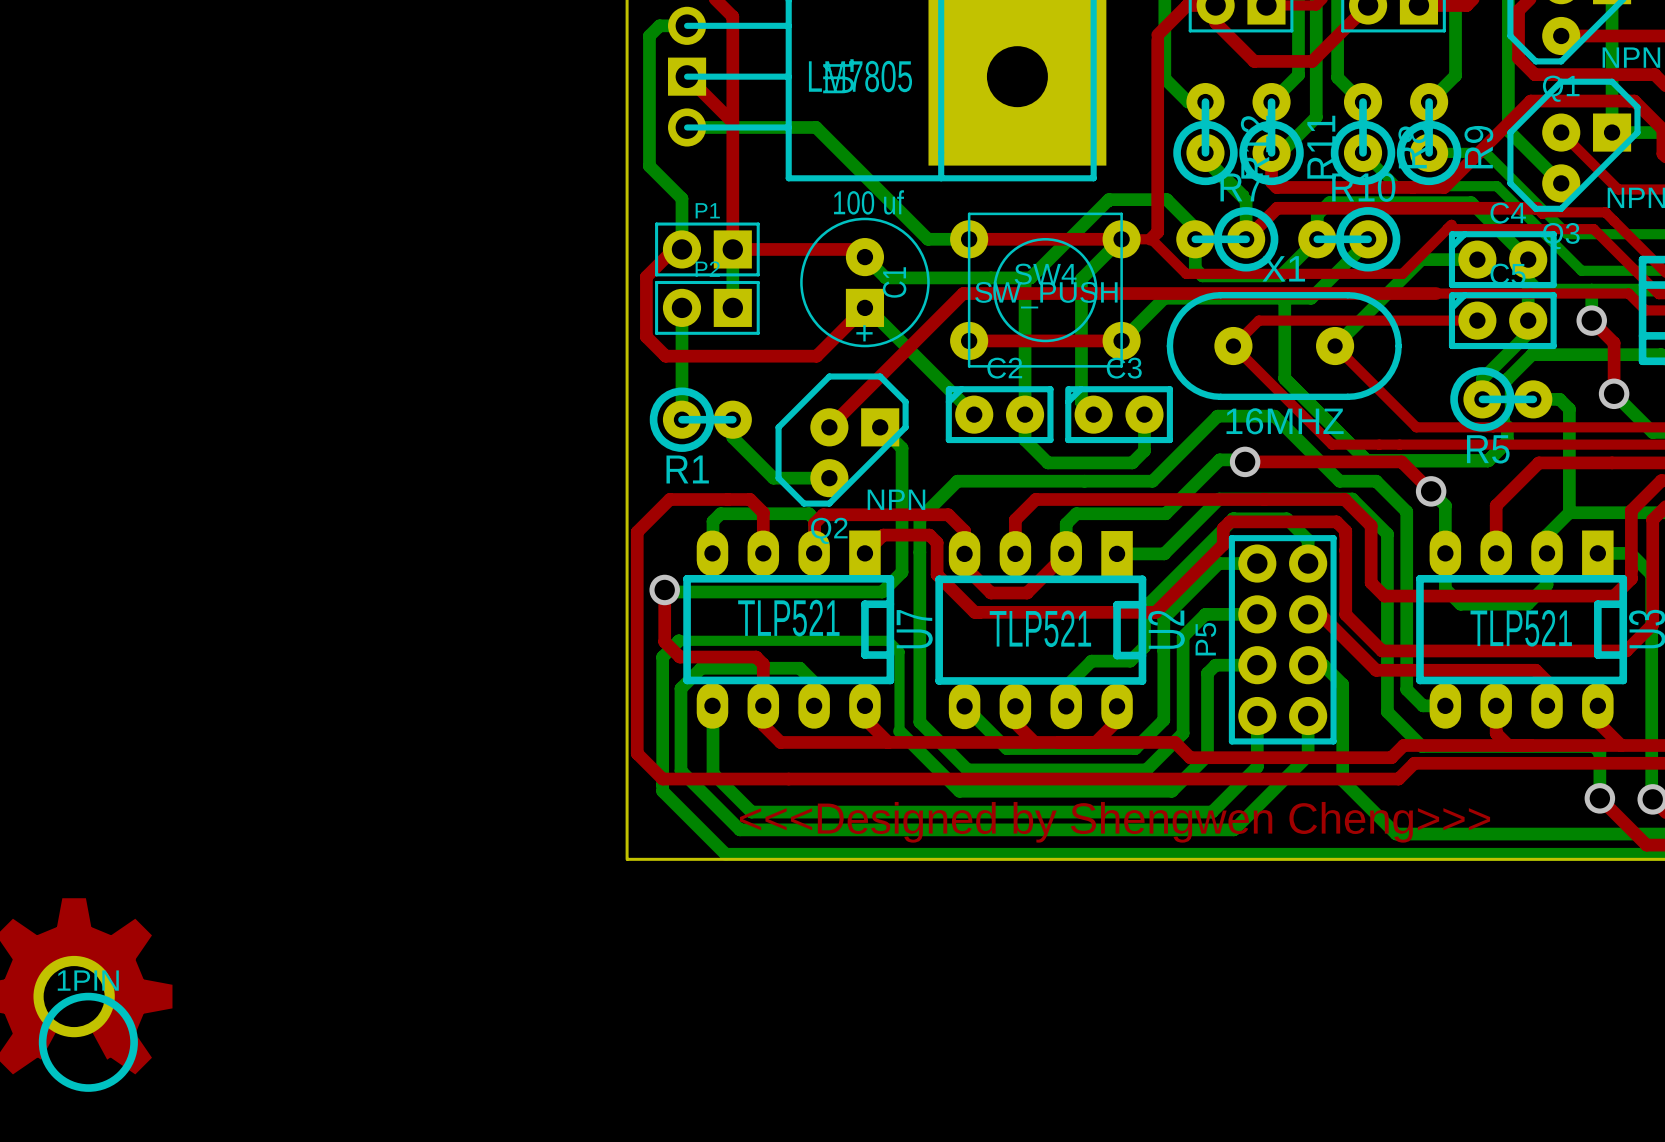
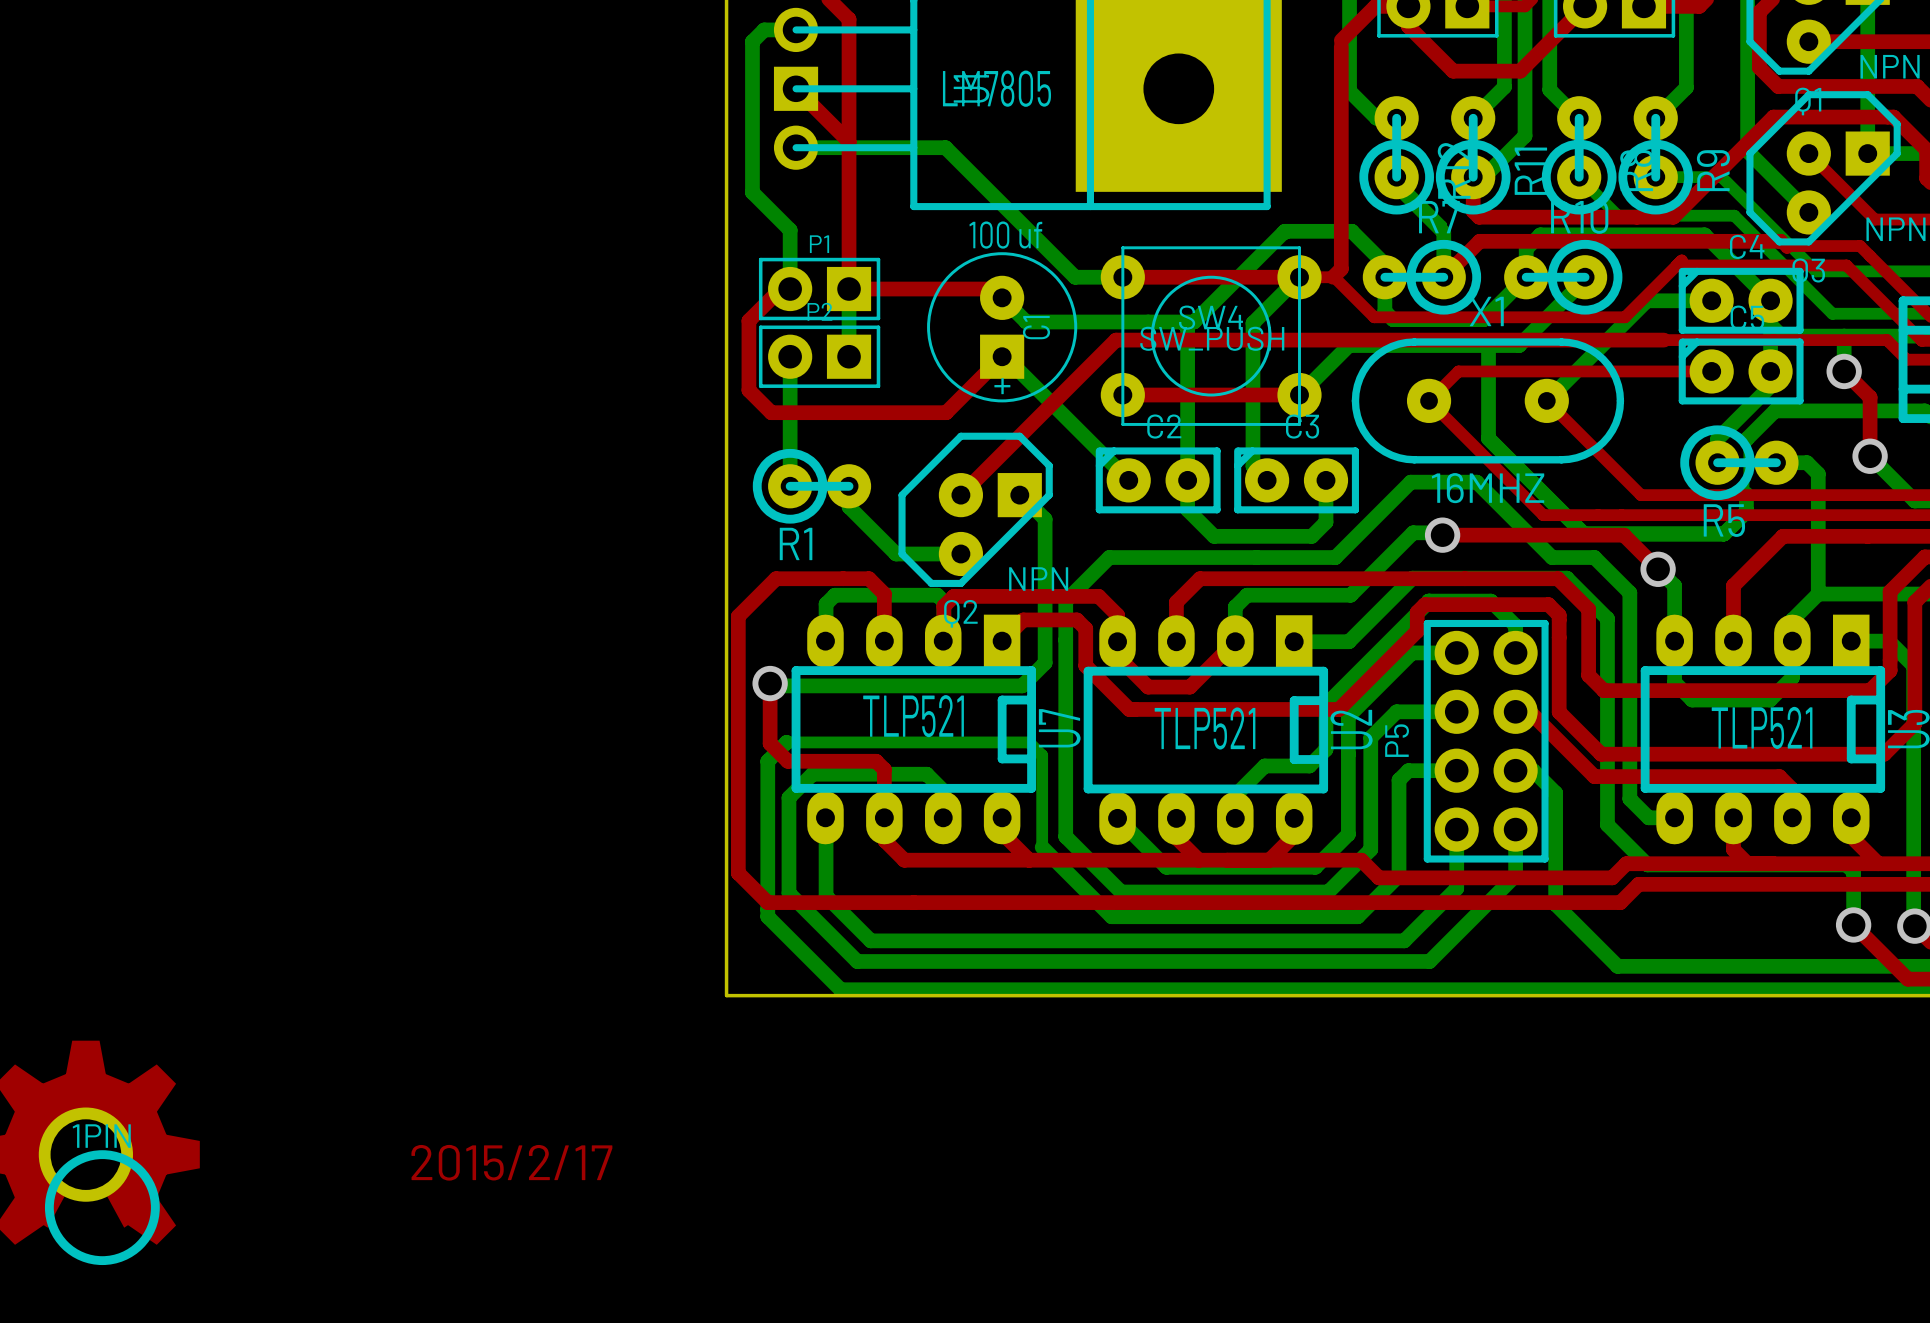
text: <<<Designed by Shengwen Cheng>>> (1115, 822) -> none
text: none -> 2015/2/17 (511, 1162)

